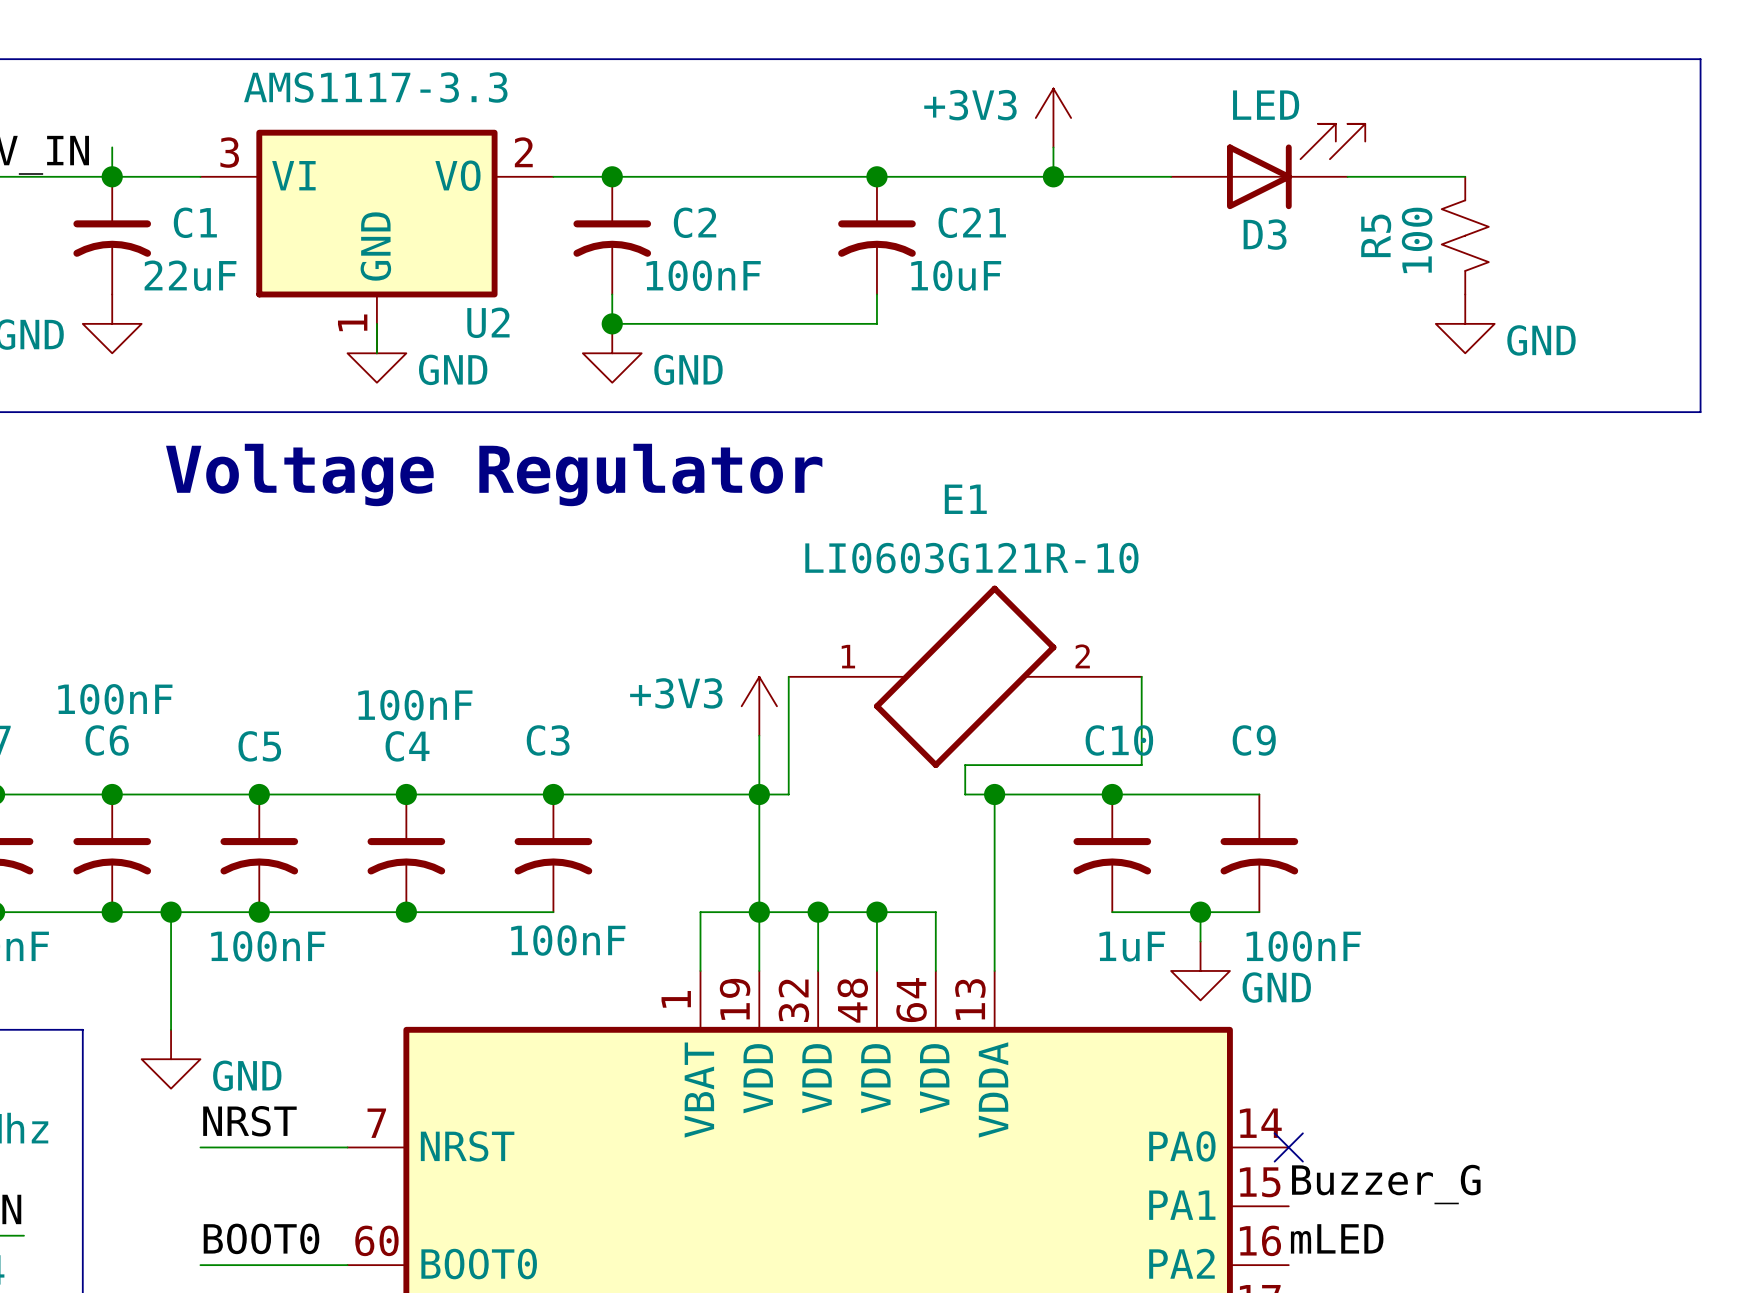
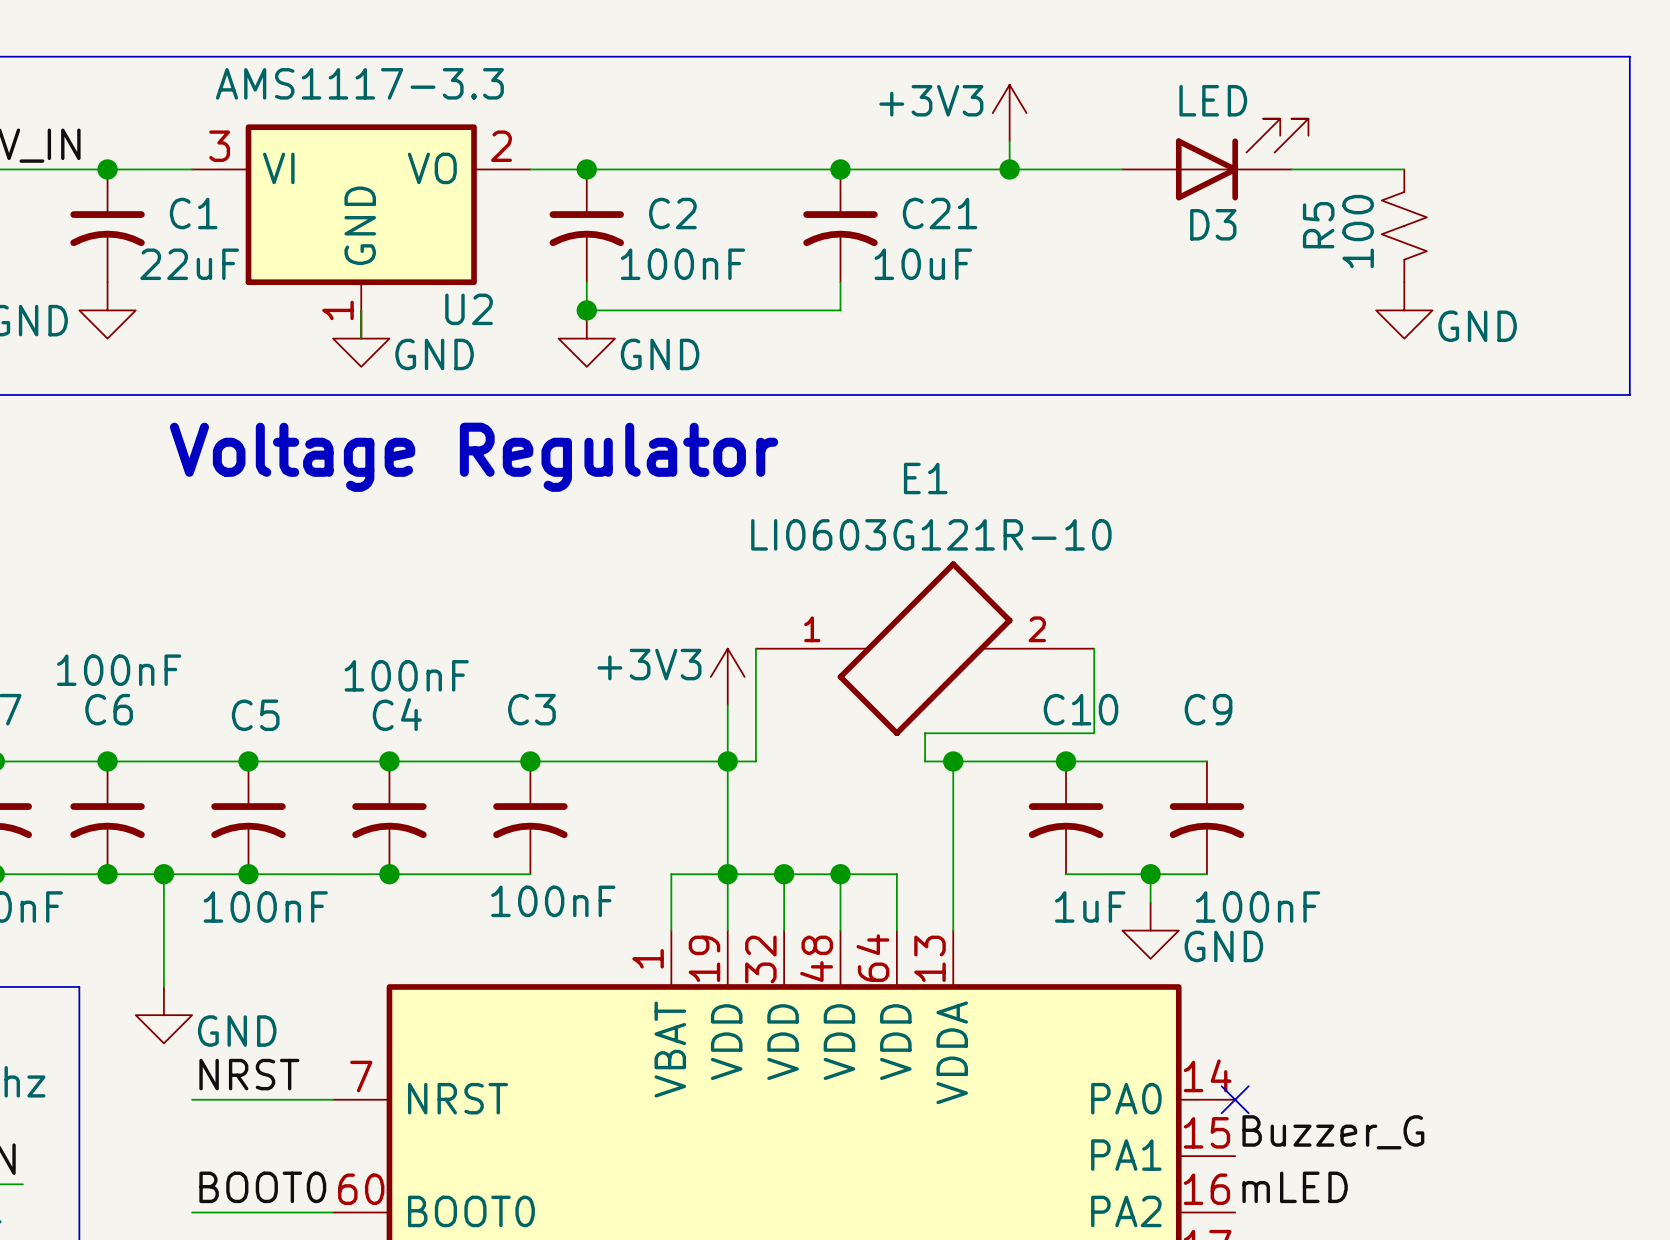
wire: (112, 147) (112, 176) -> none

